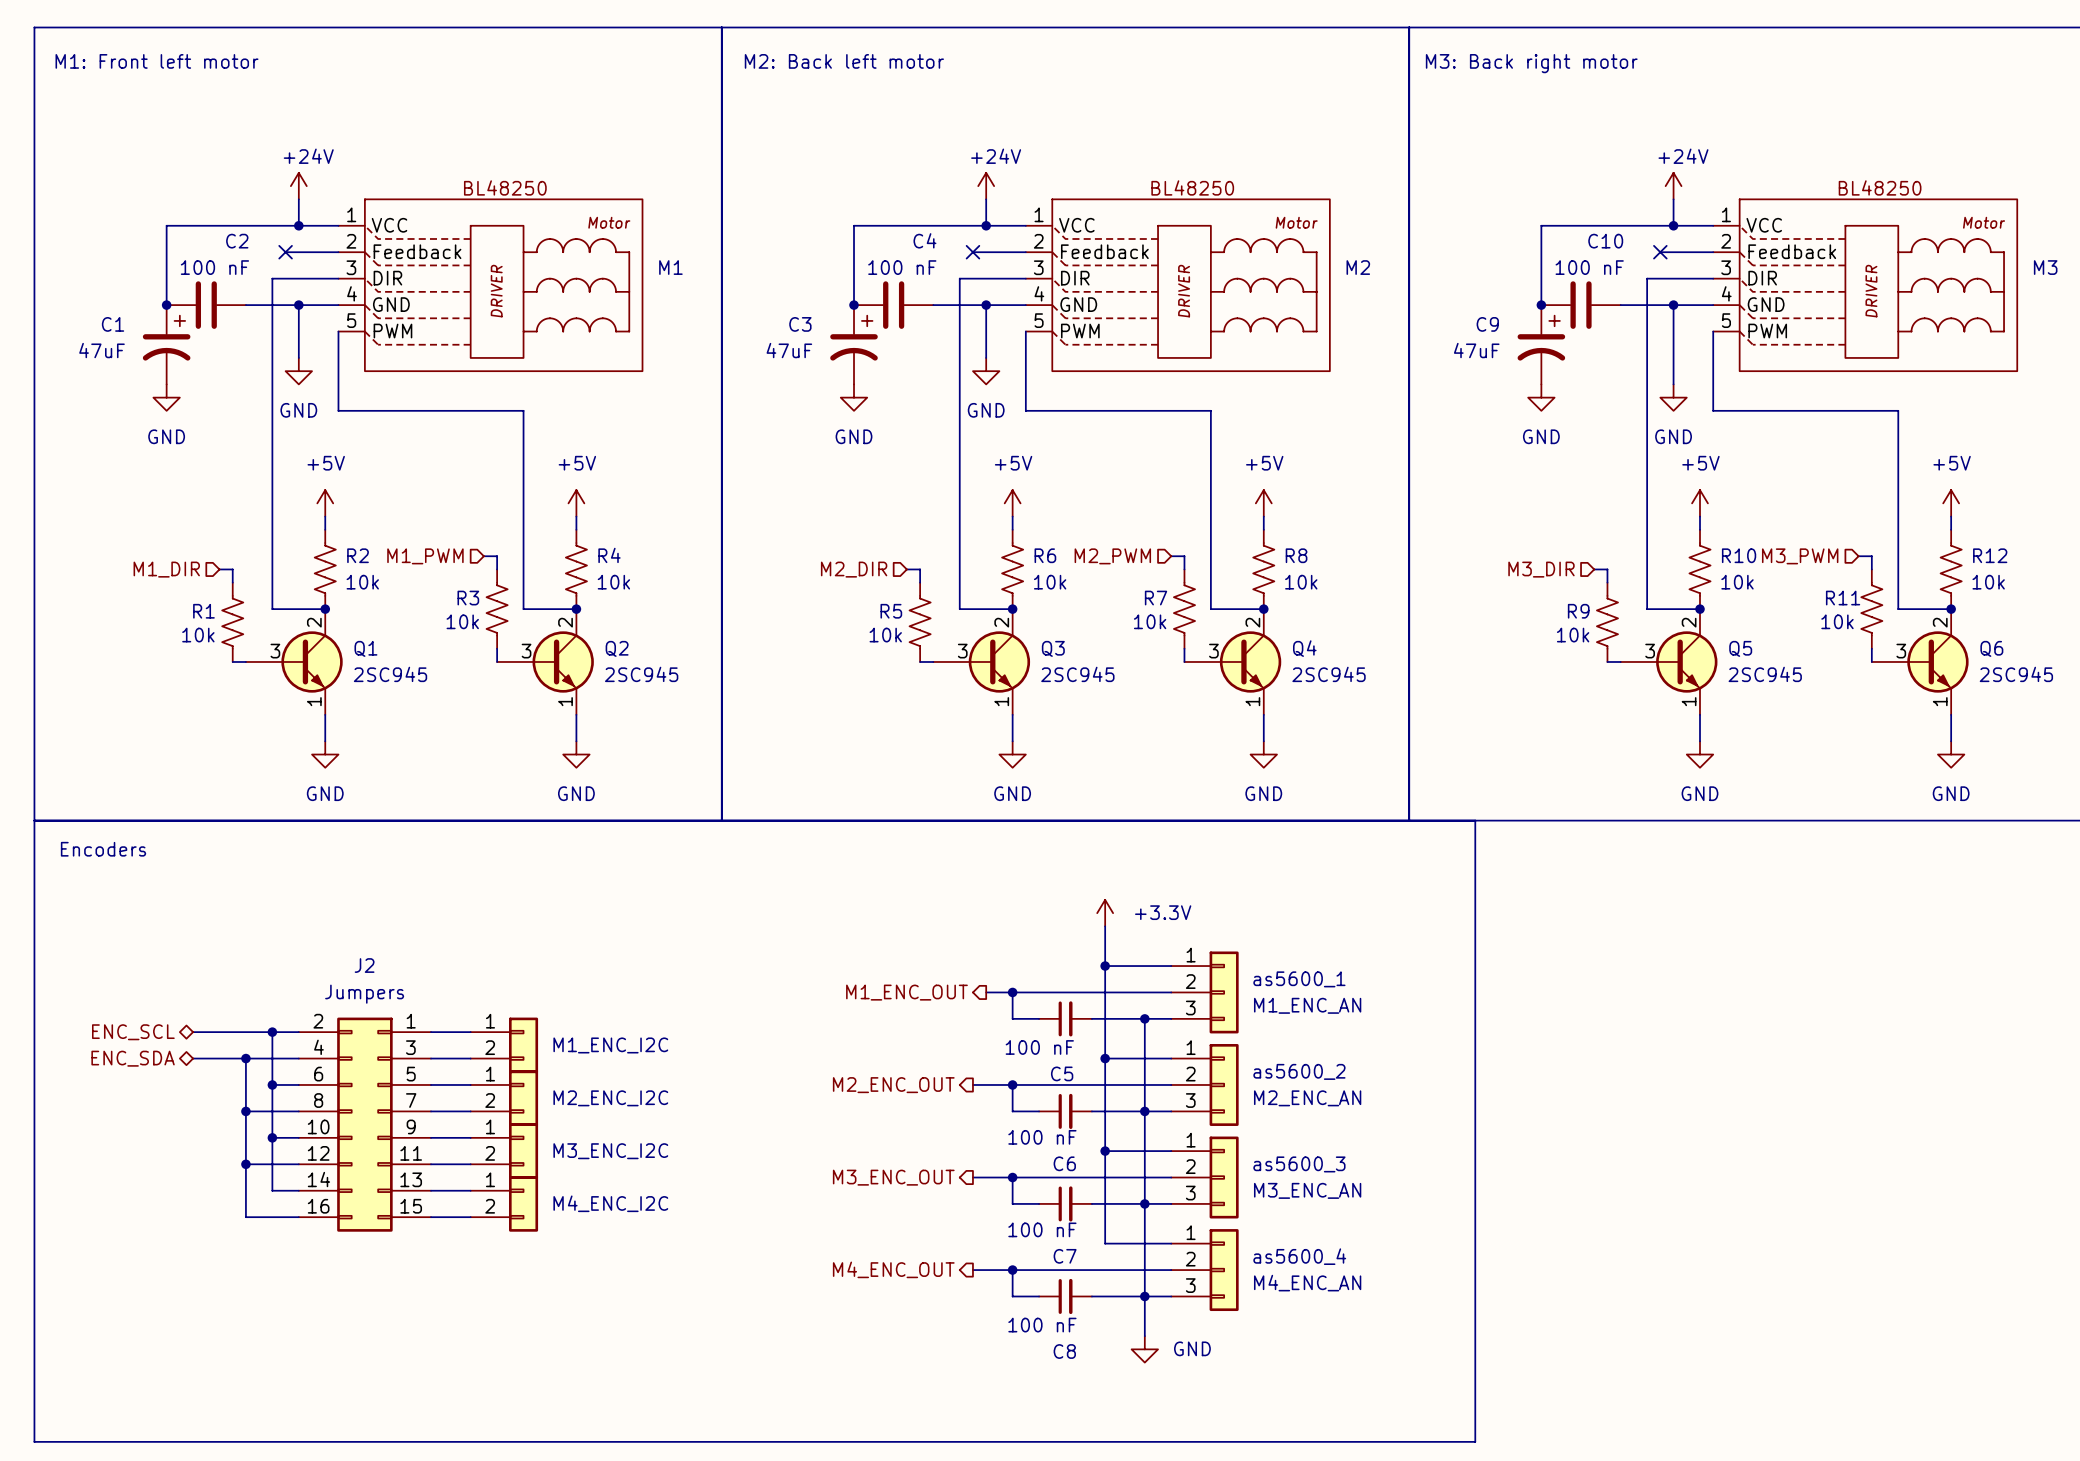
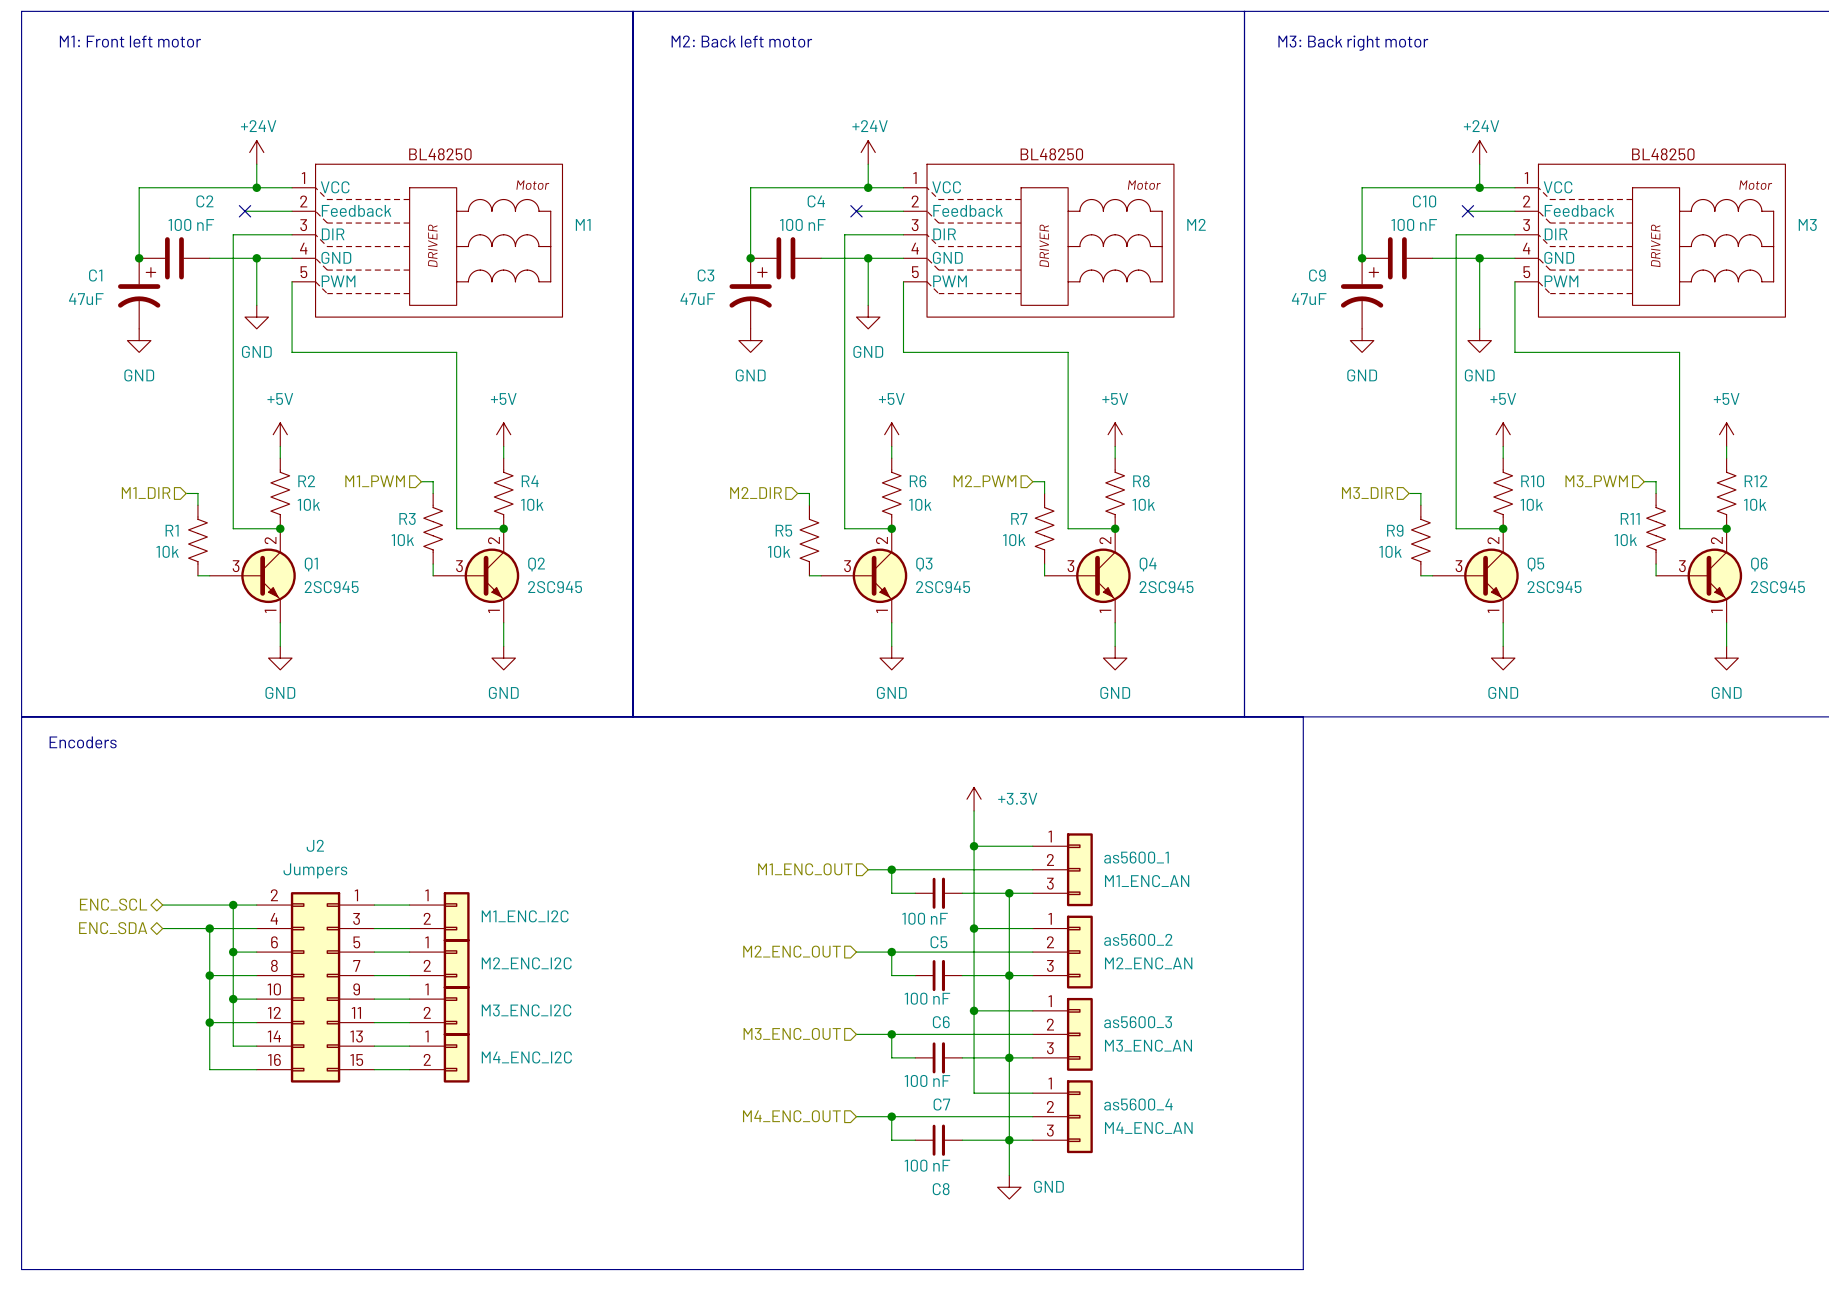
hierarchical label shape: output (906, 992) -> input (805, 869)
hierarchical label shape: output (893, 1085) -> input (792, 951)
hierarchical label shape: output (893, 1177) -> input (792, 1033)
hierarchical label shape: output (893, 1269) -> input (791, 1116)

